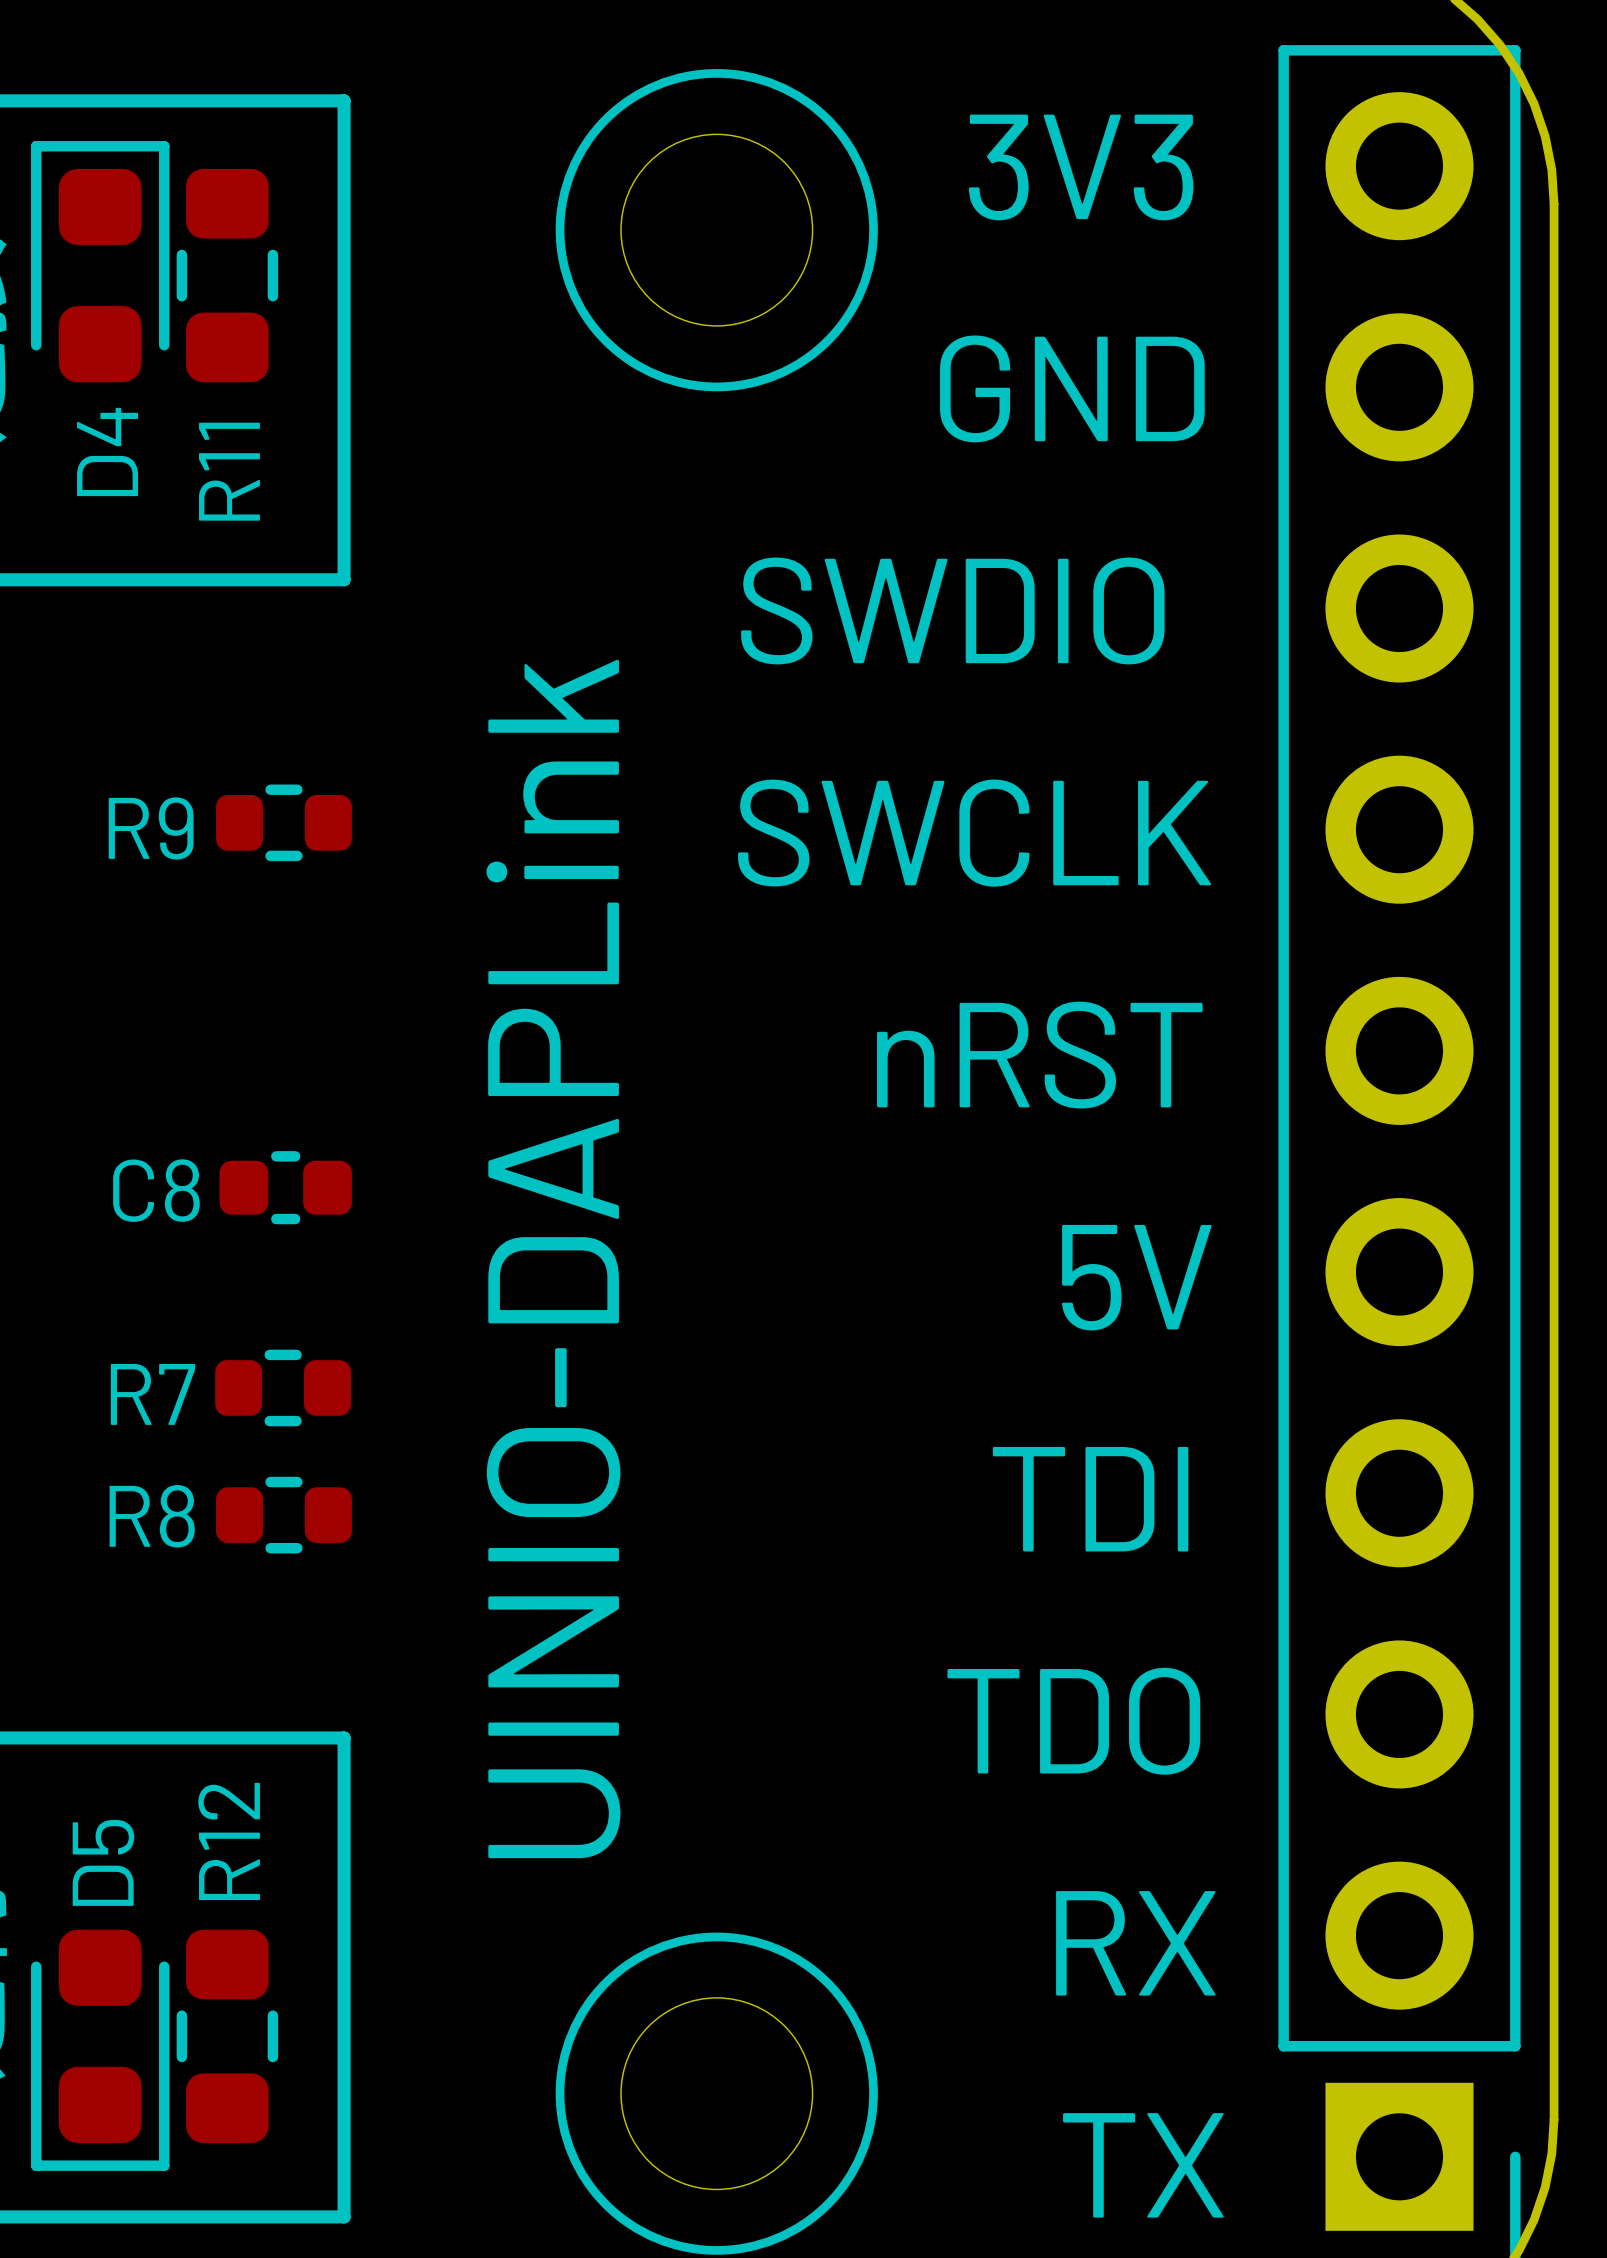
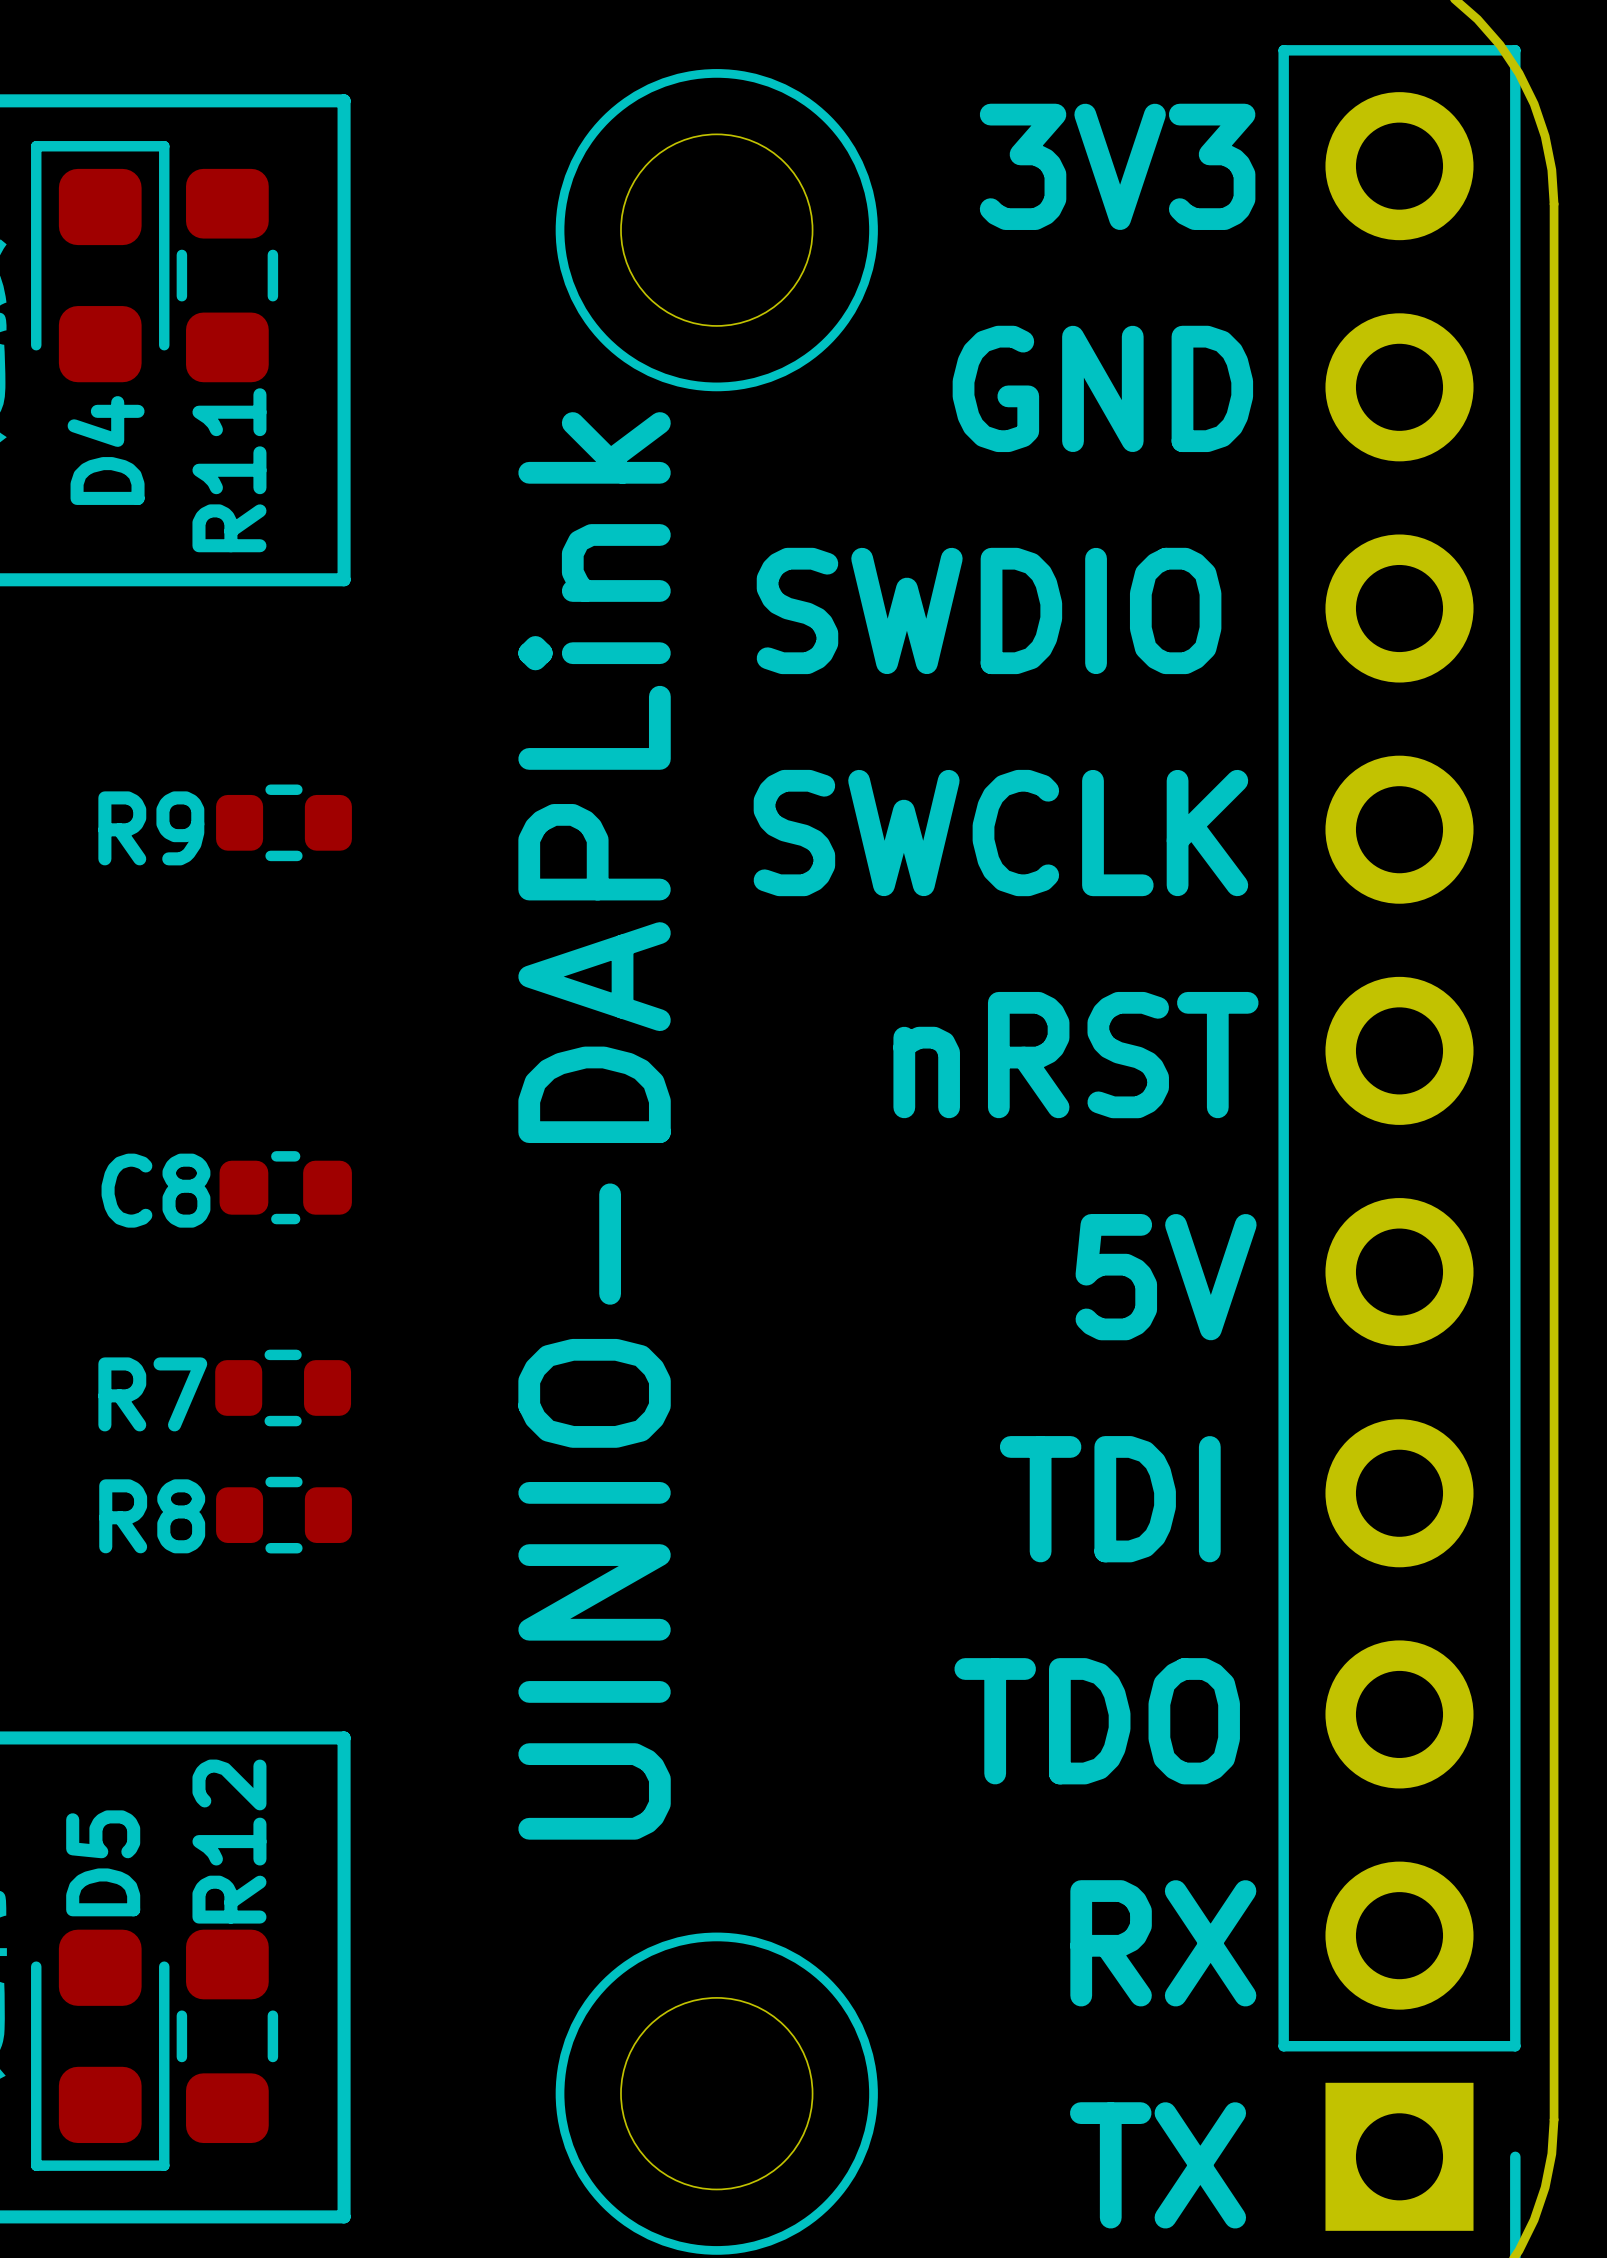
text position: UINIO-DAPLink (553, 1258) -> UINIO-DAPLink (594, 1125)

